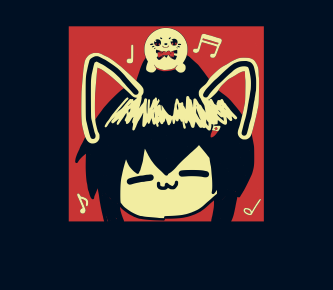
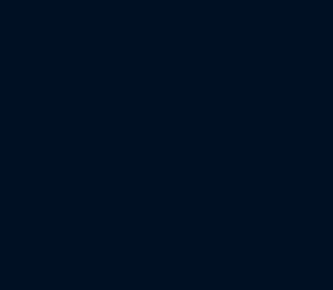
drawing: [68, 26, 264, 222] -> none

